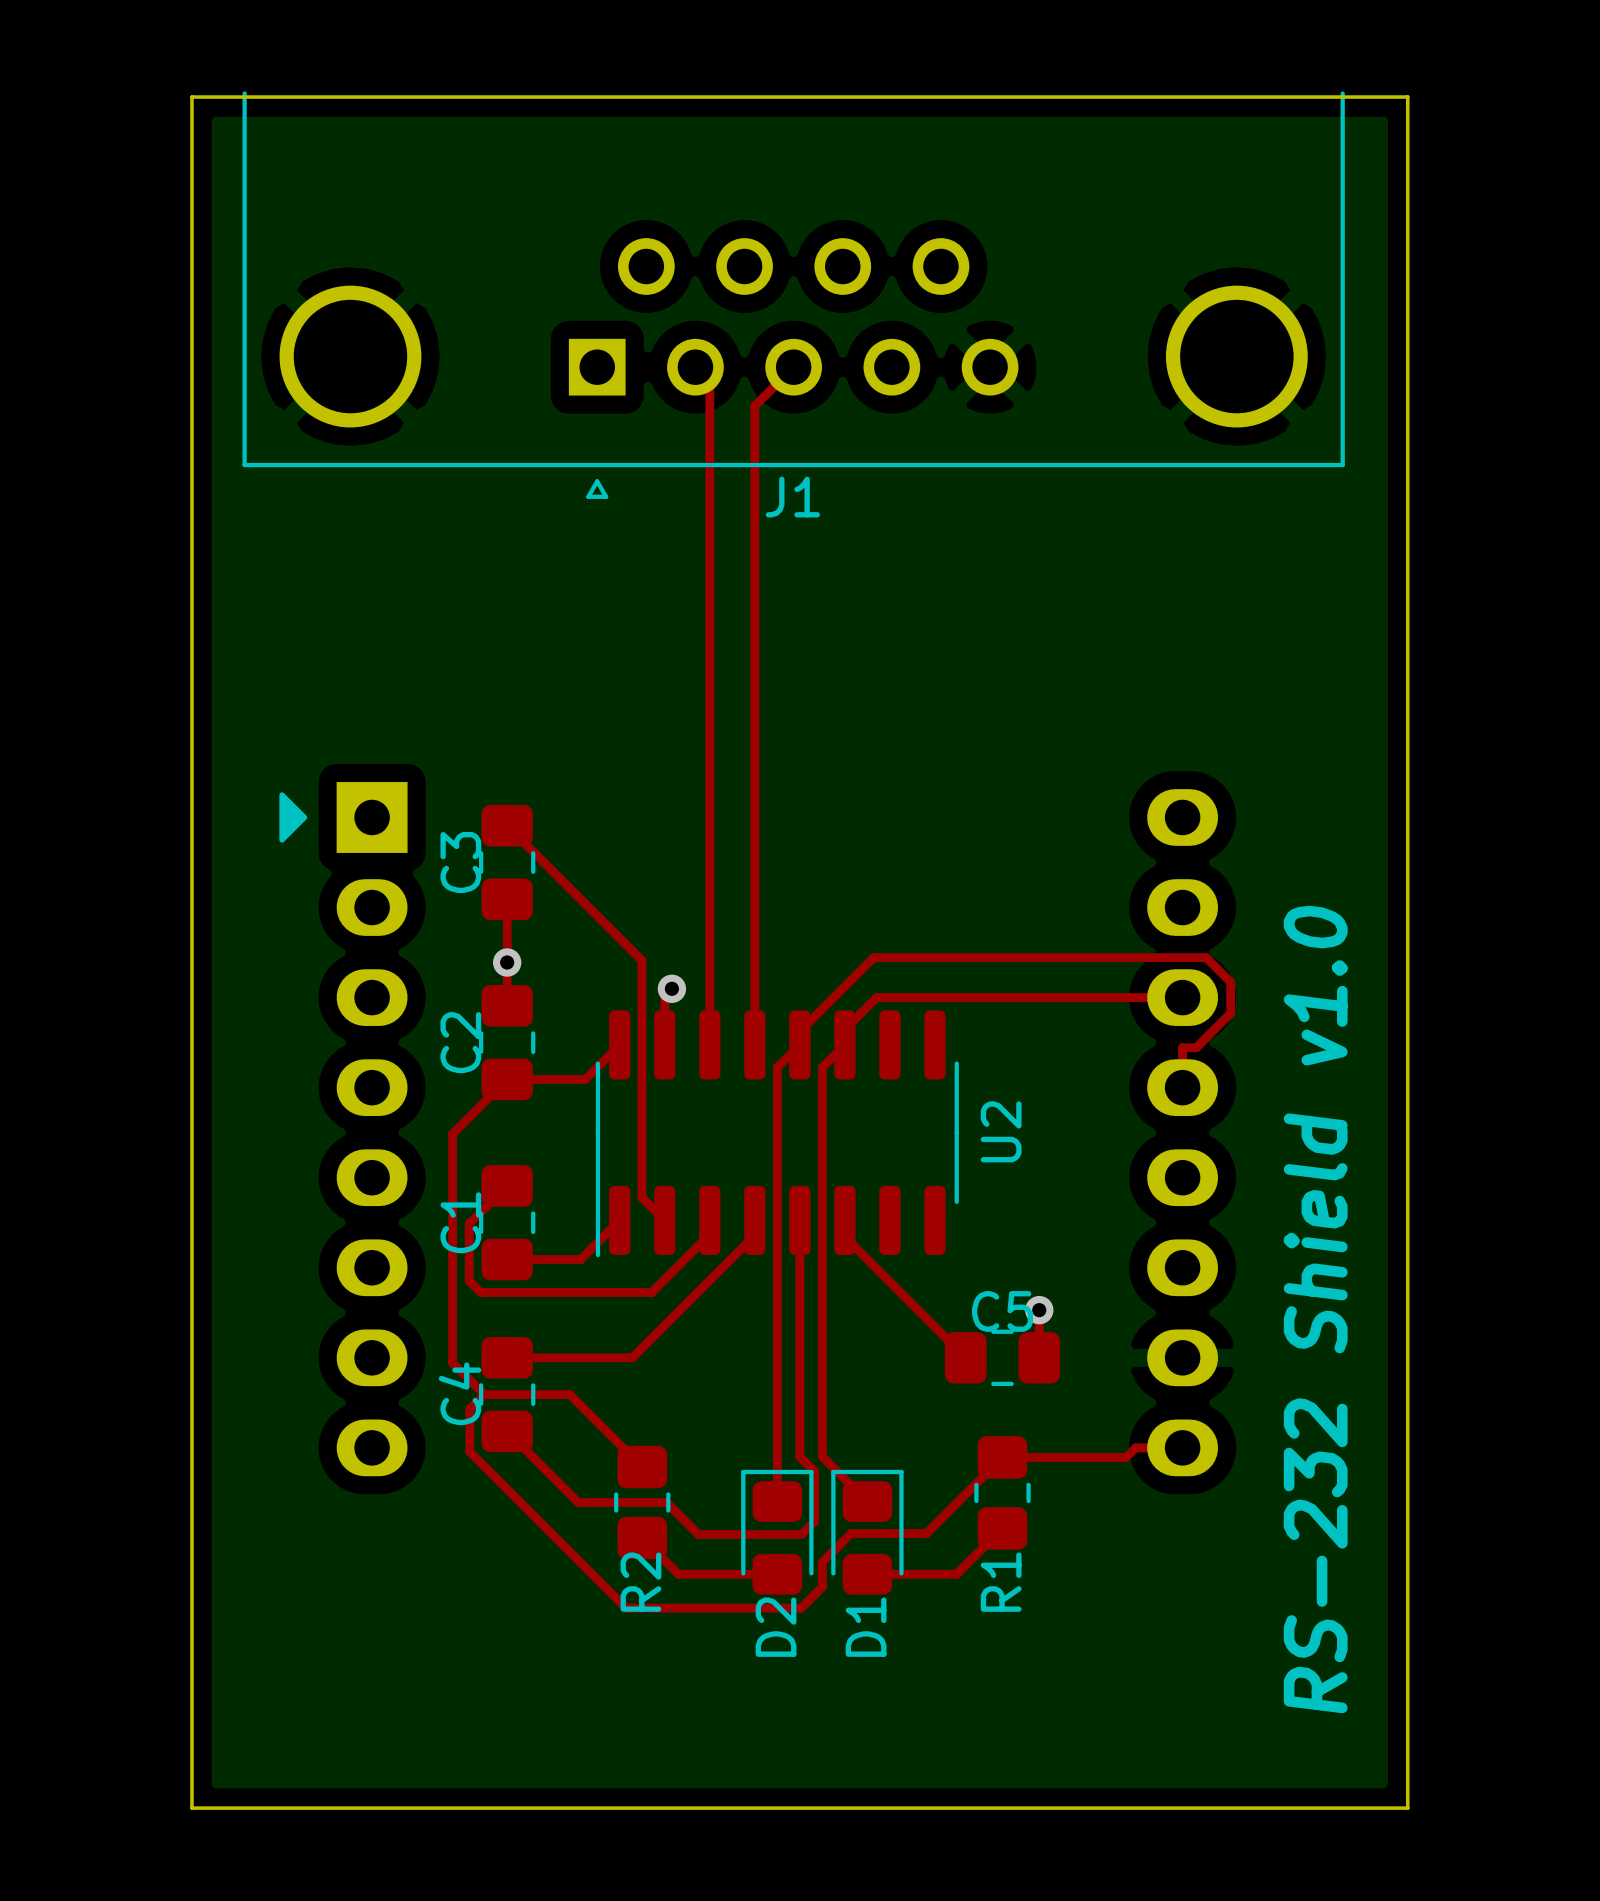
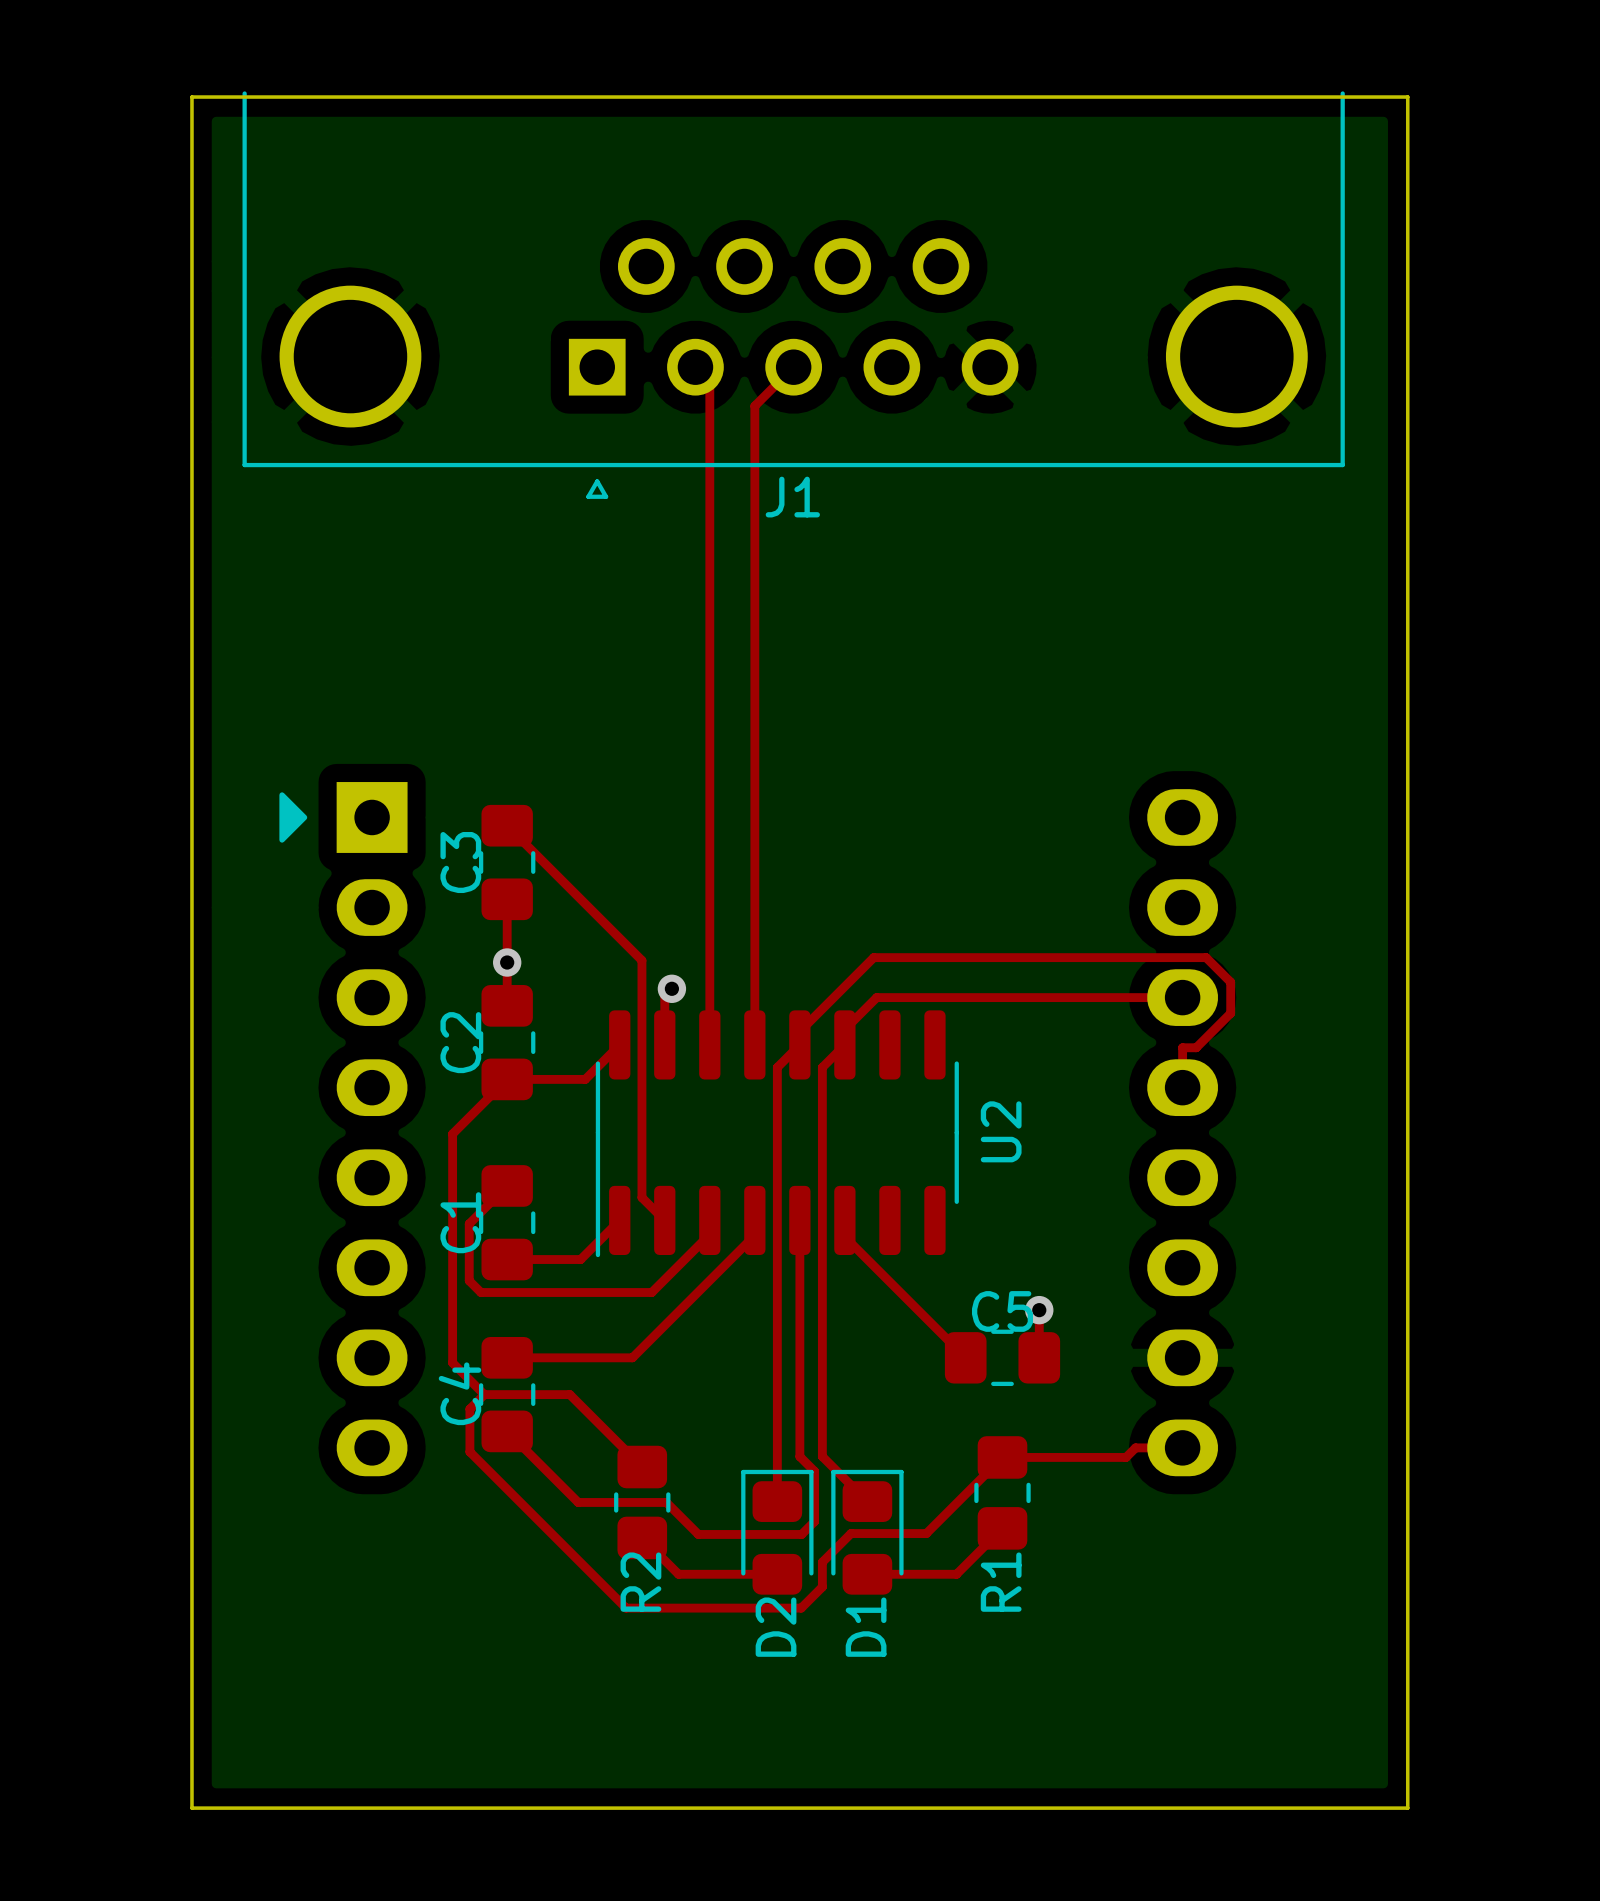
text: RS-232 Shield v1.0 (1315, 1309) -> none

